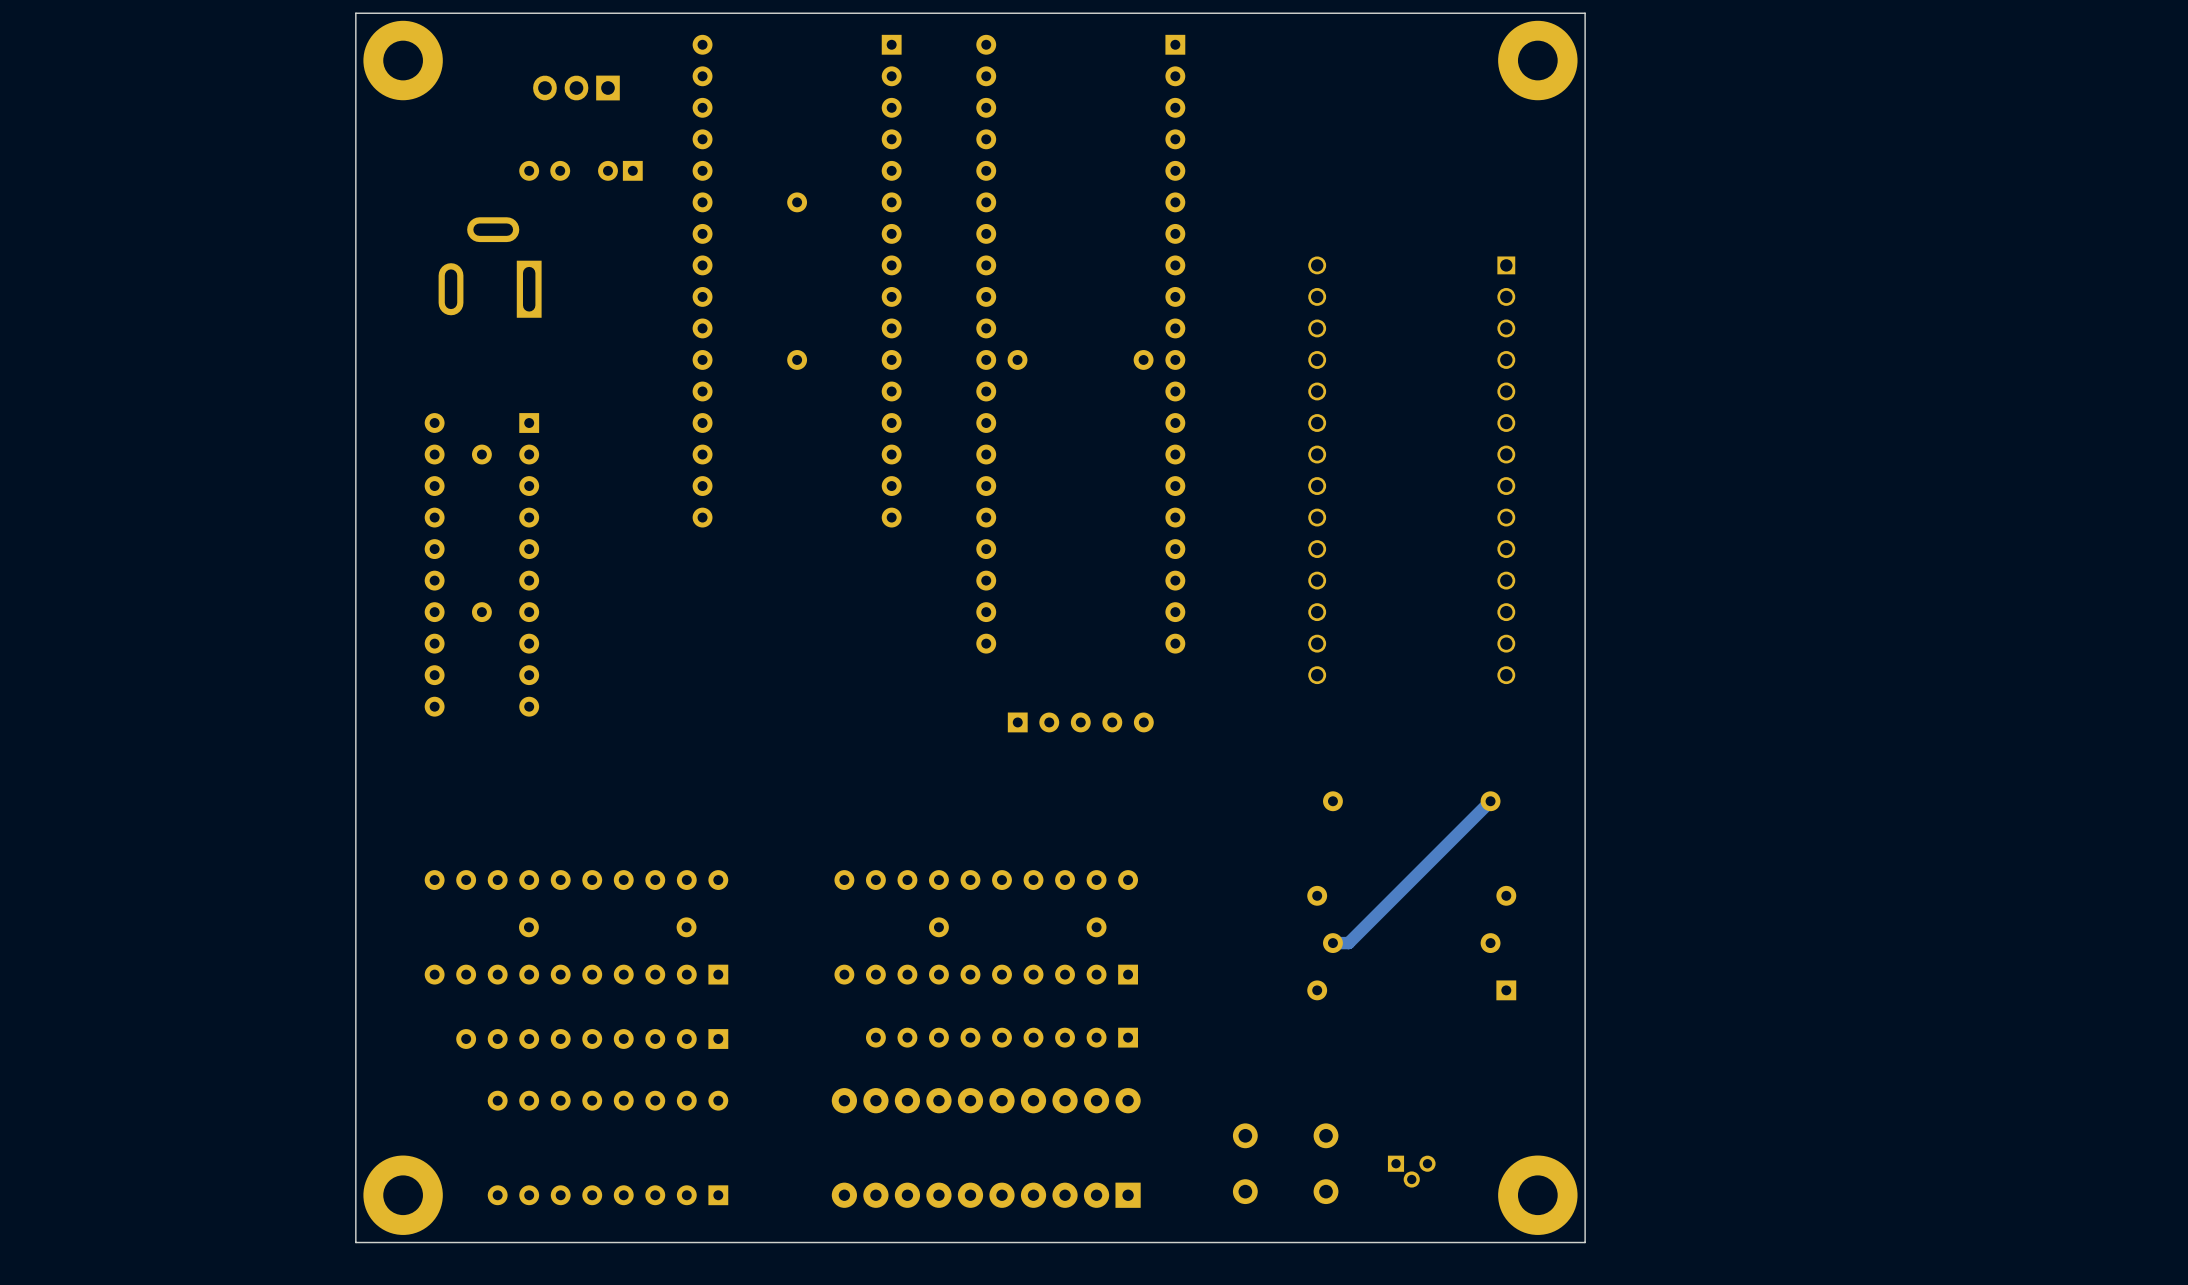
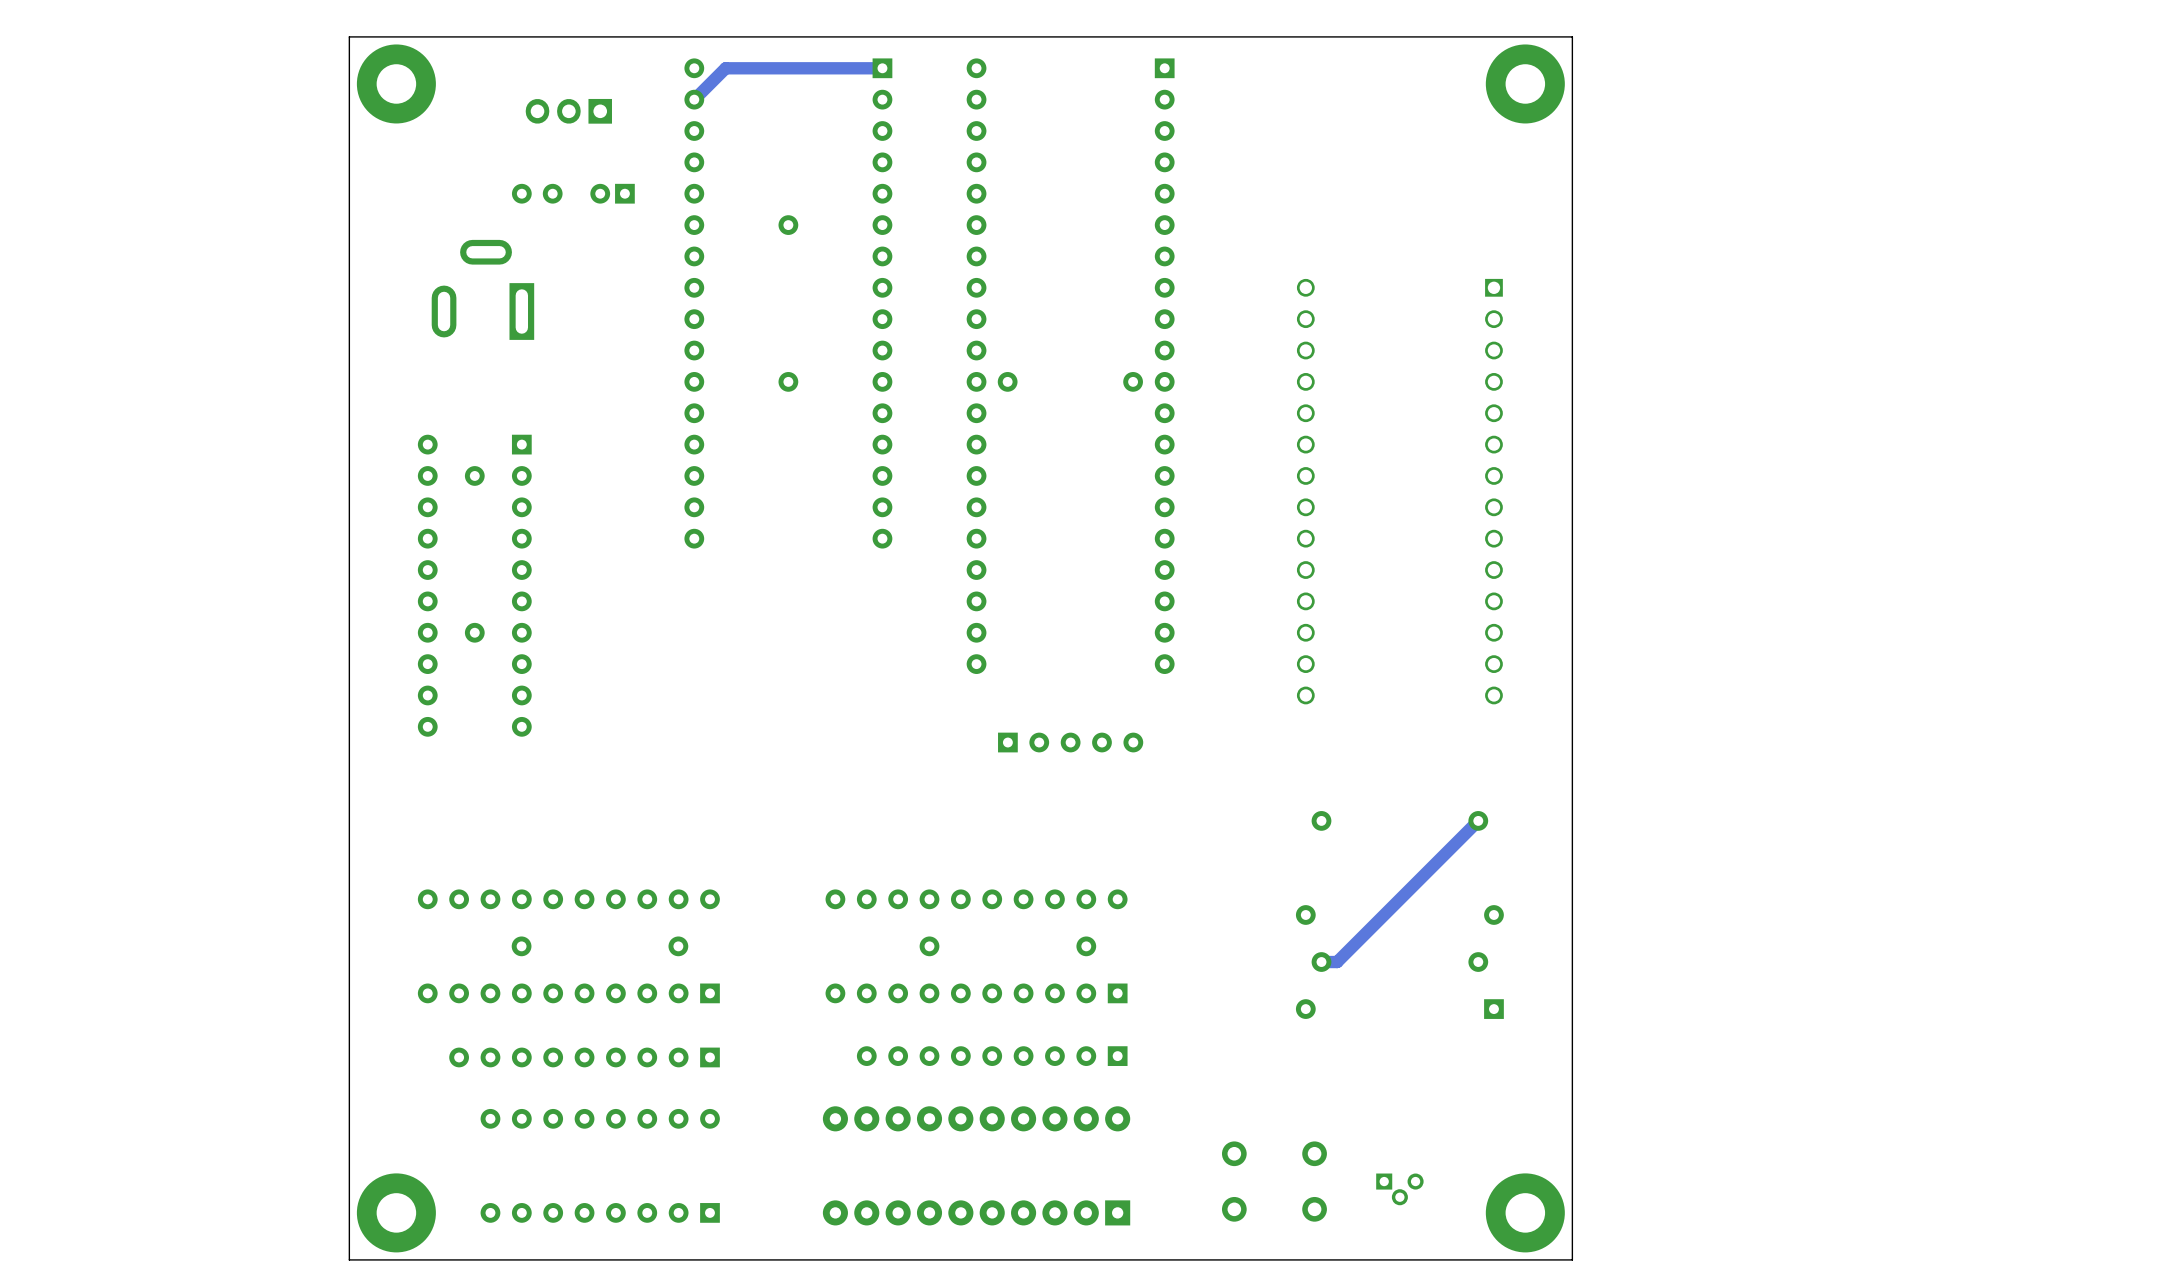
track: none -> (882, 68) (725, 68) (694, 99)

